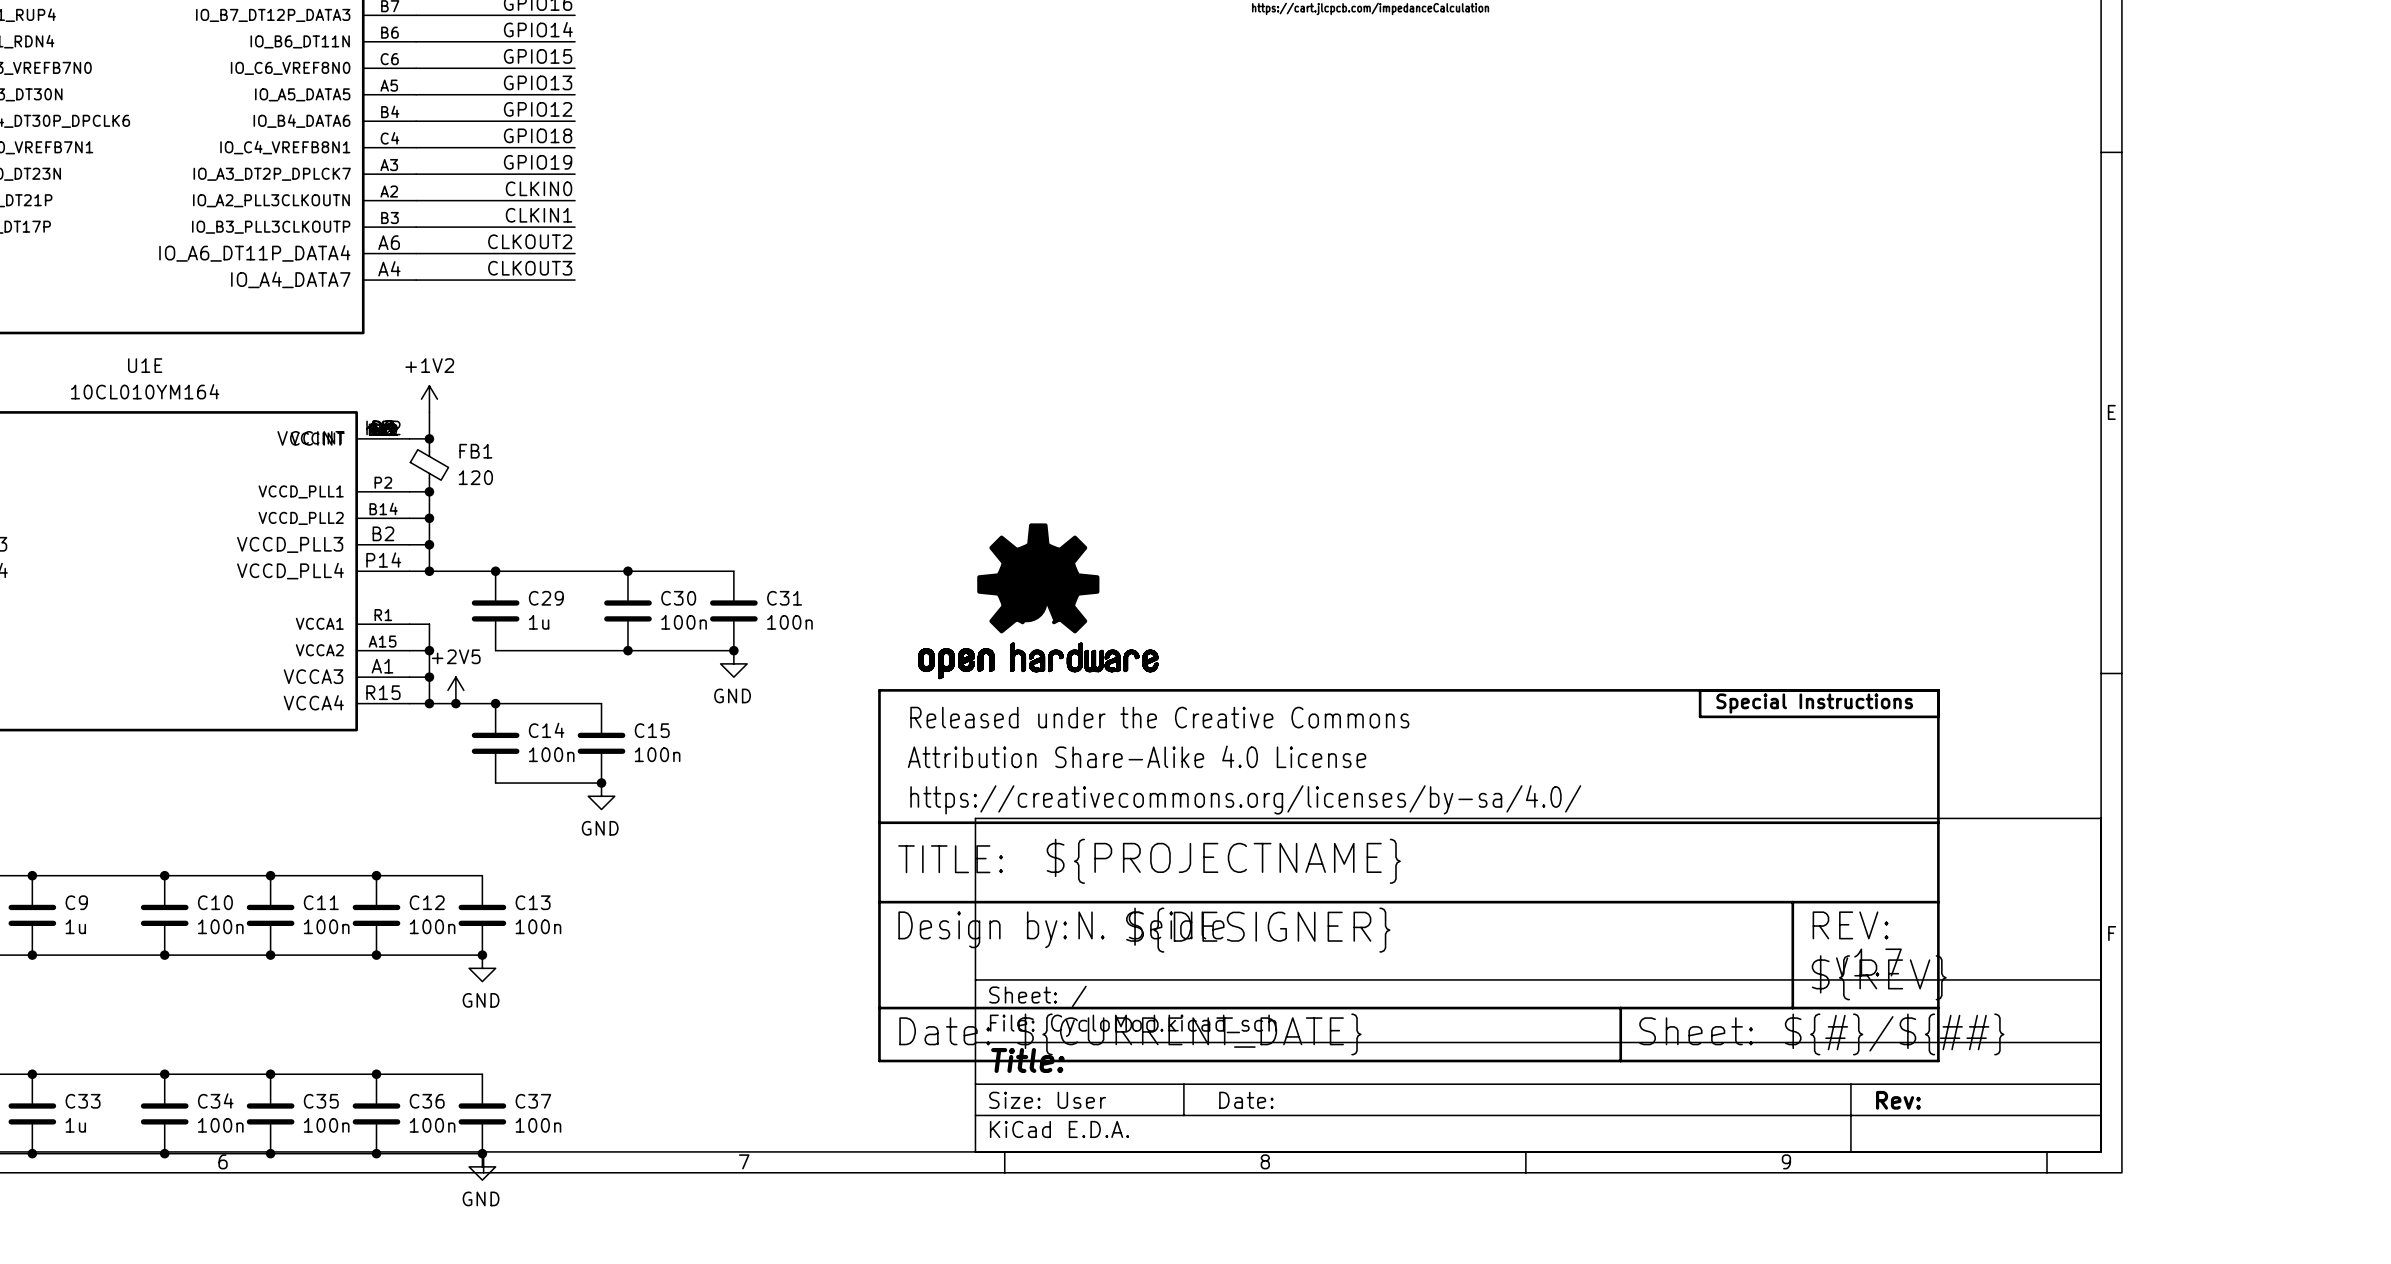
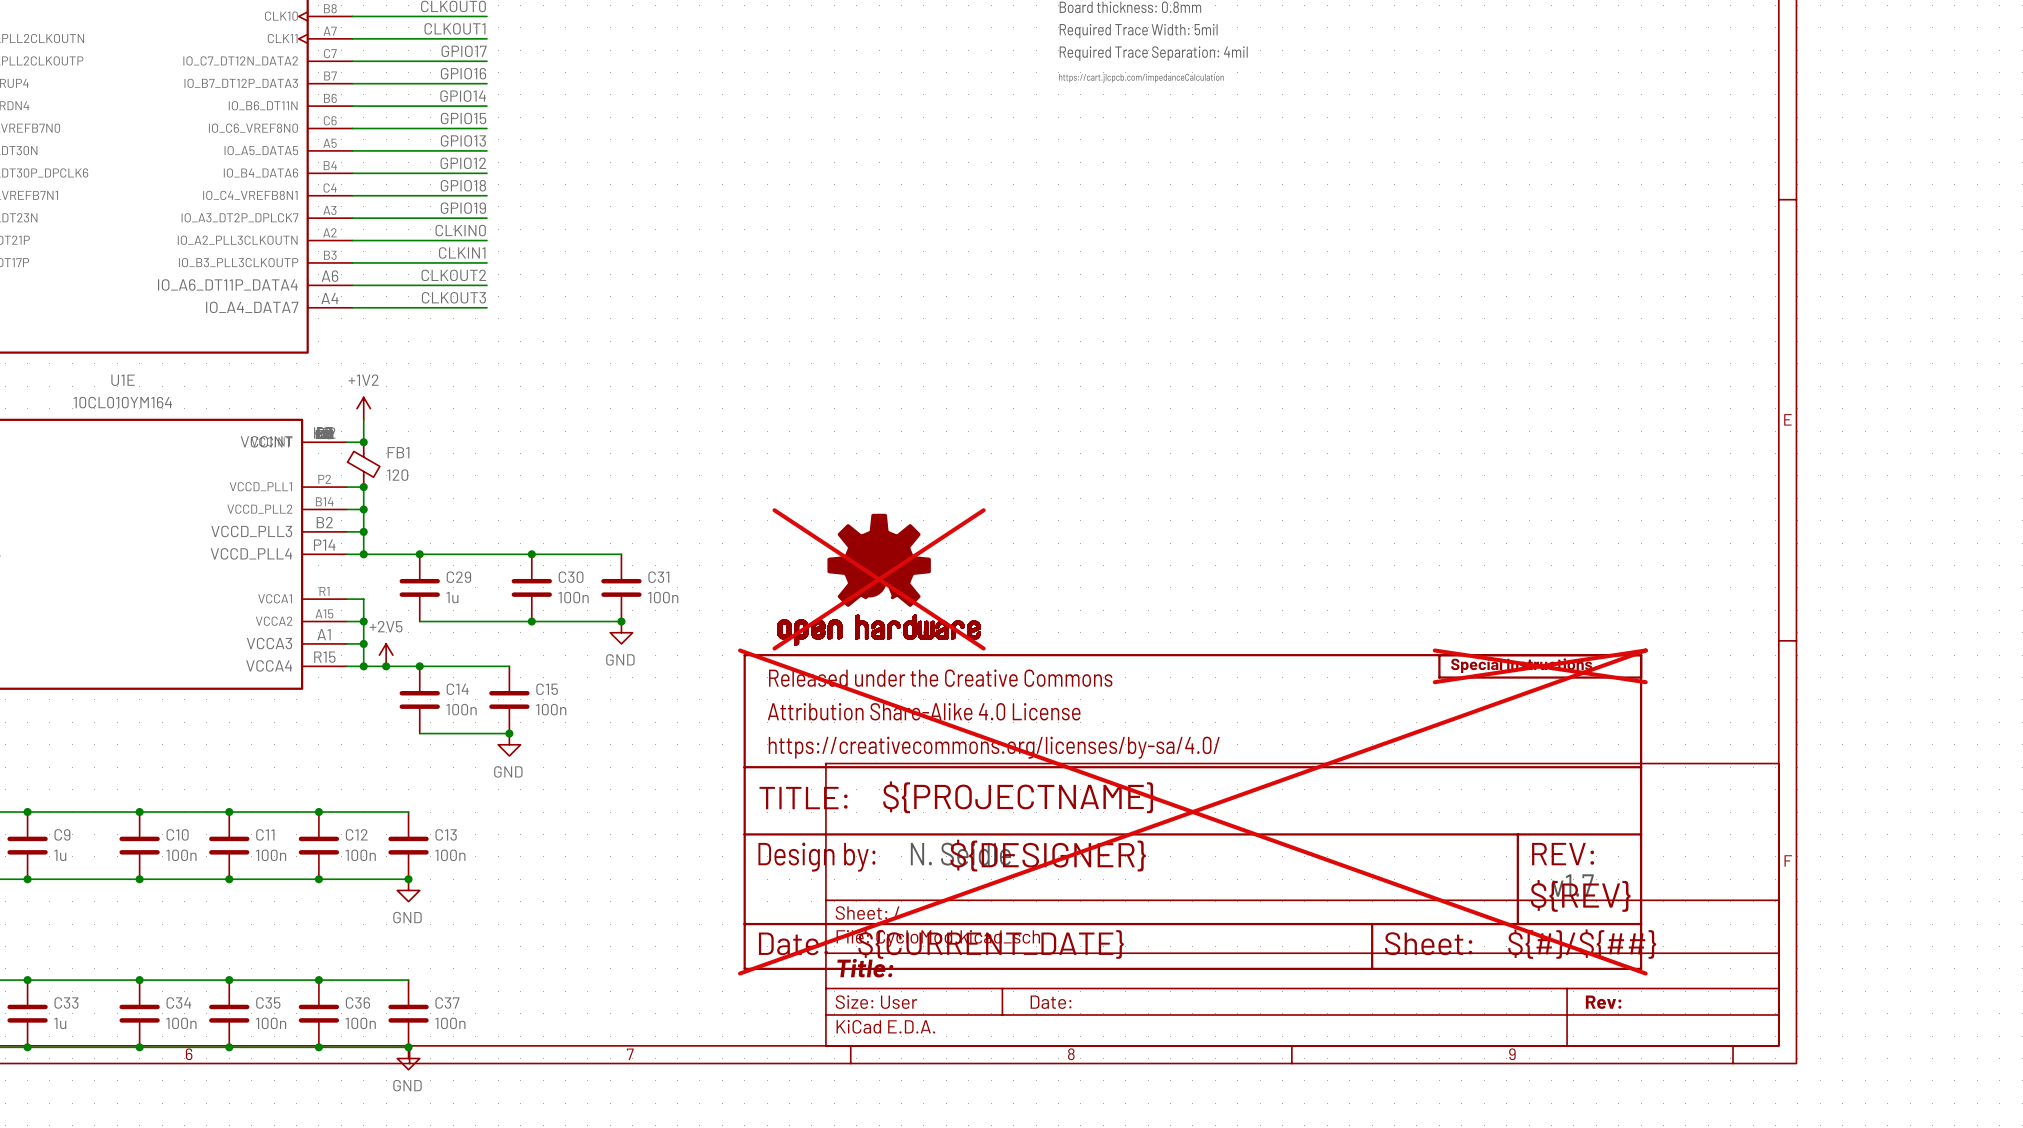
part do-not-place cross: none -> (879, 579)
part do-not-place cross: none -> (1540, 666)
part do-not-place cross: none -> (1192, 812)

